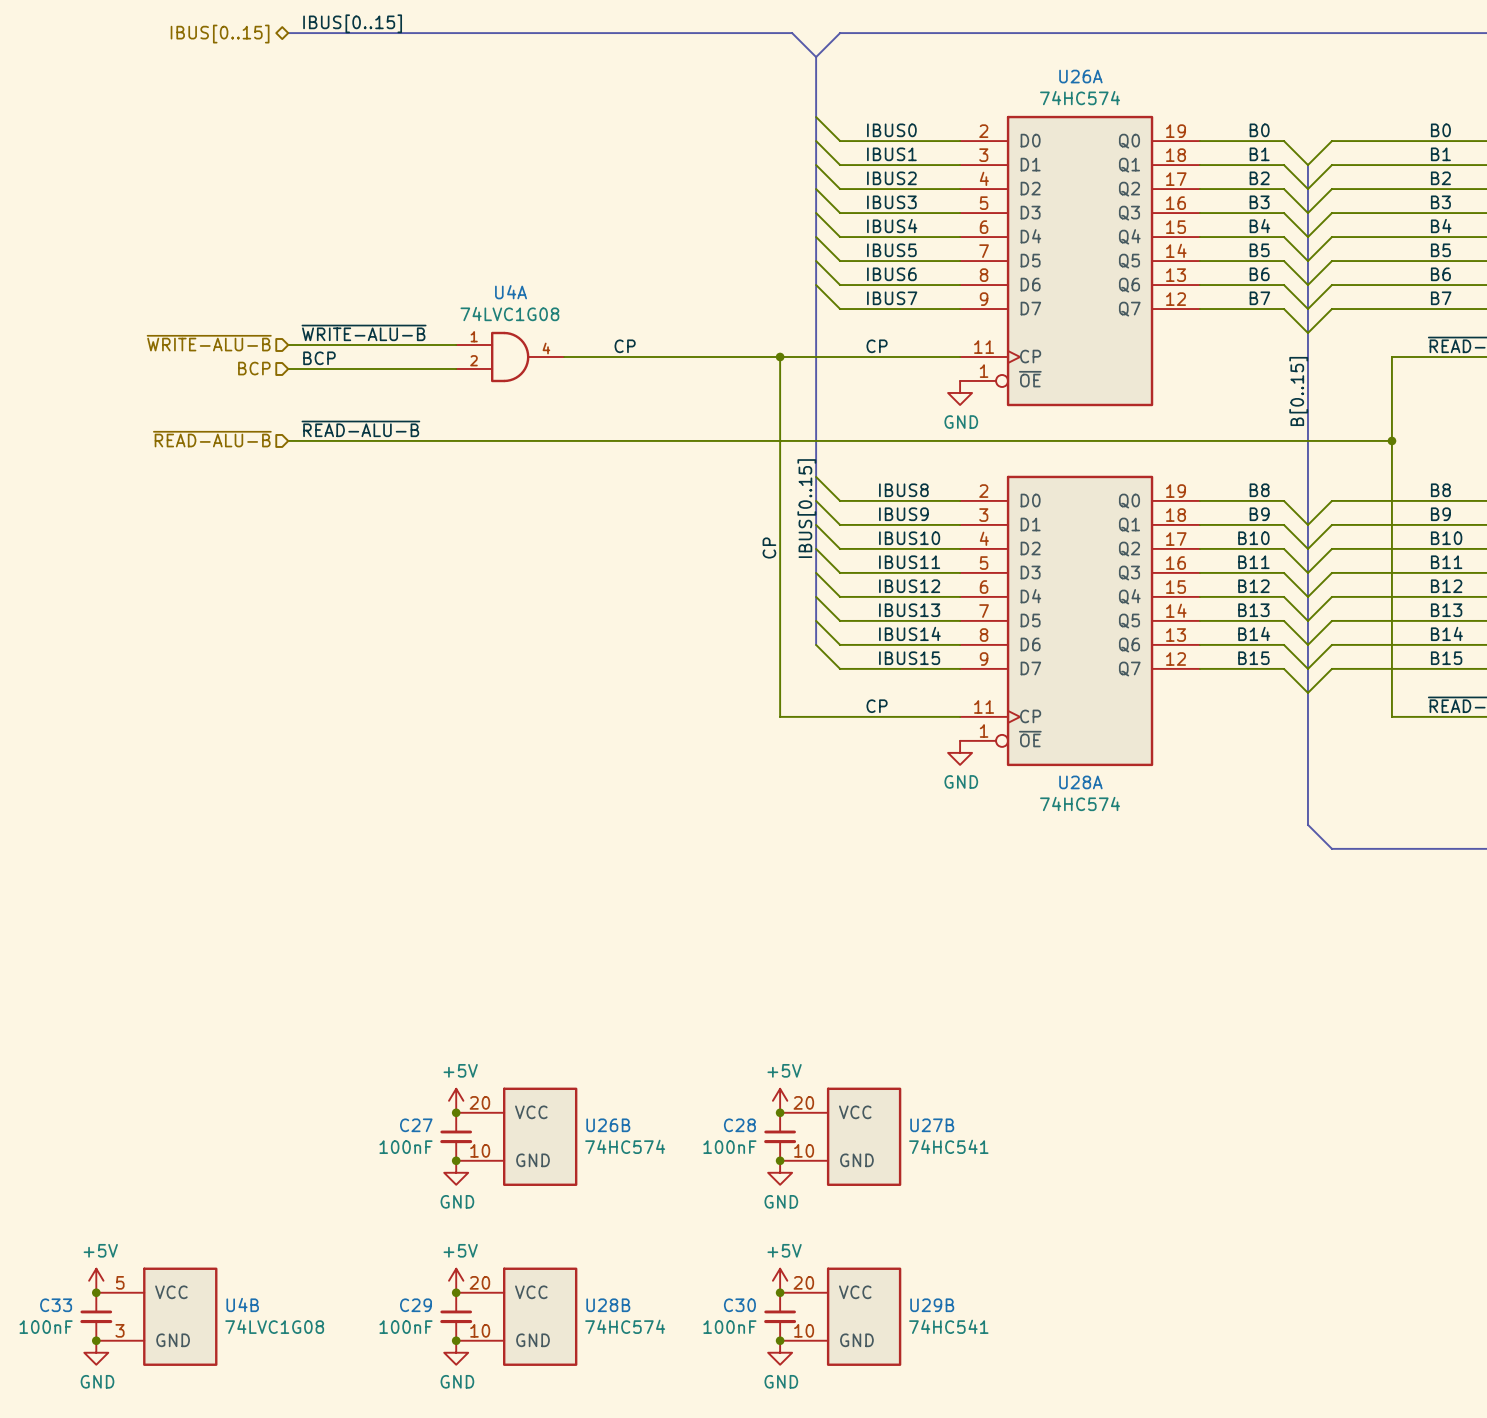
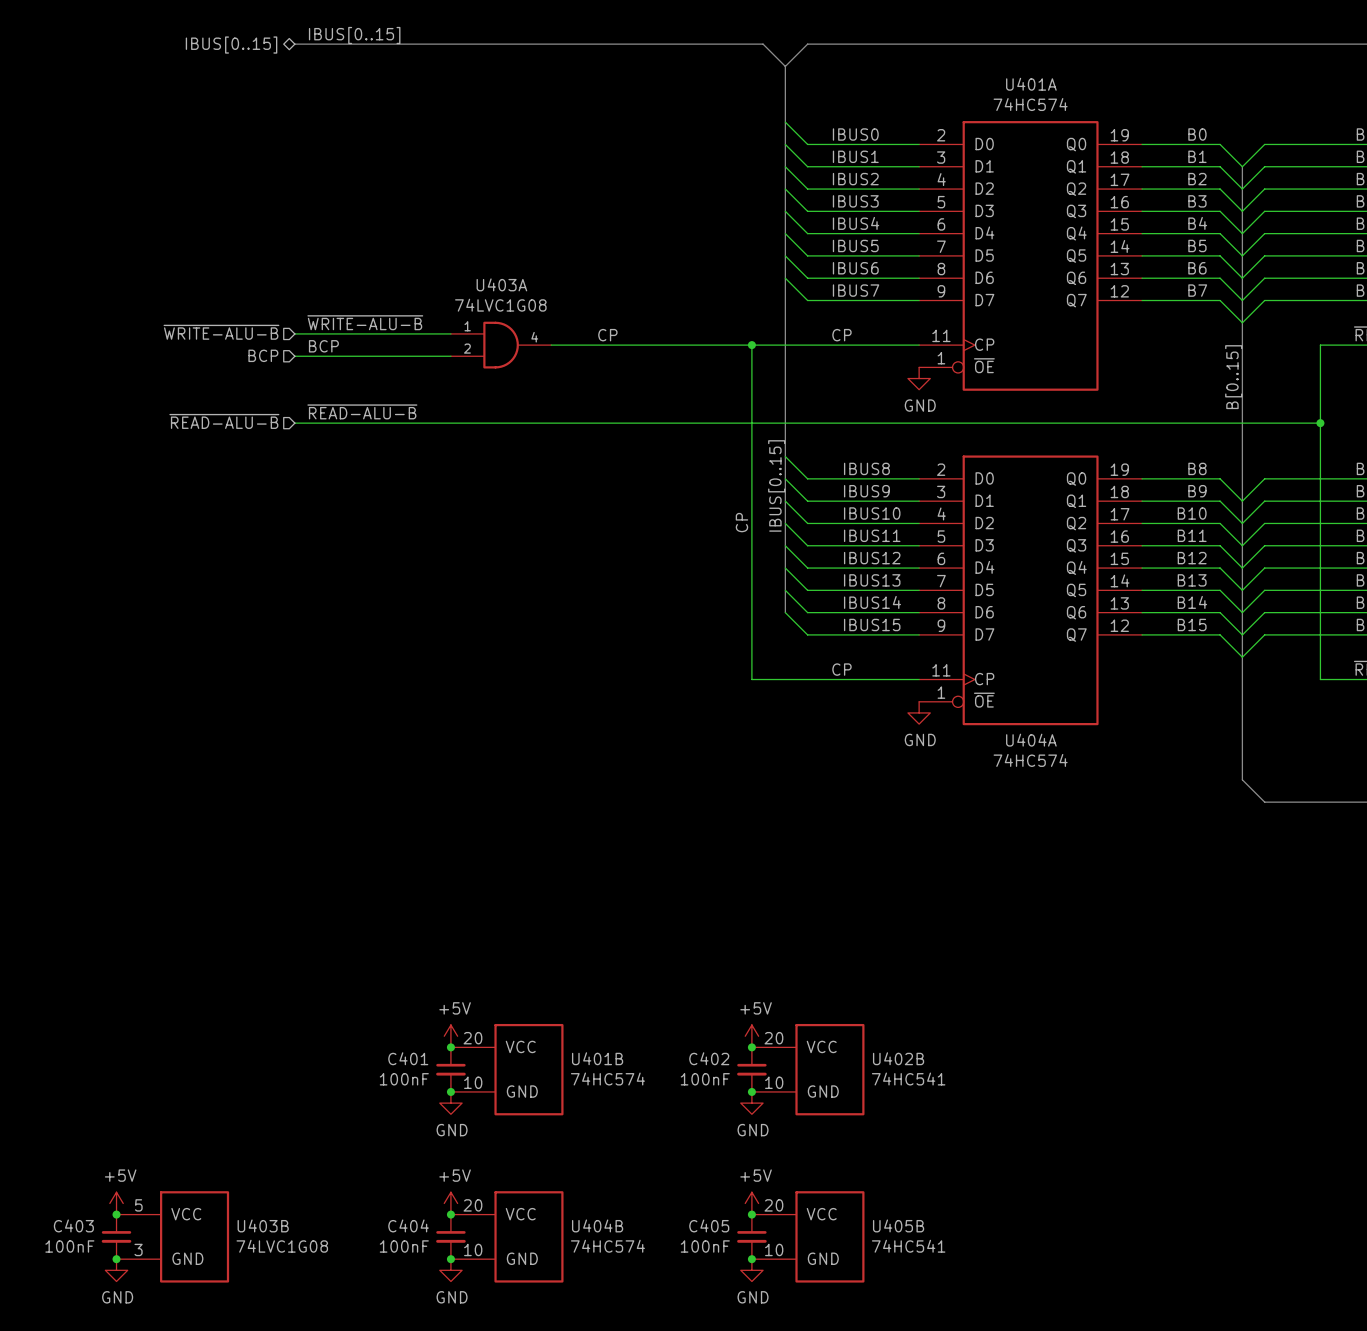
U26A name: U26A (1080, 76) -> U401A (1031, 84)
U4A name: U4A (511, 292) -> U403A (501, 284)
U28A name: U28A (1080, 782) -> U404A (1031, 740)
C27 name: C27 (416, 1125) -> C401 (408, 1058)
U26B name: U26B (608, 1125) -> U401B (597, 1058)
C28 name: C28 (739, 1125) -> C402 (709, 1058)
U27B name: U27B (932, 1125) -> U402B (898, 1058)
U4B name: U4B (242, 1304) -> U403B (263, 1225)
C33 name: C33 (56, 1305) -> C403 (73, 1225)
C29 name: C29 (416, 1305) -> C404 (408, 1225)
U28B name: U28B (608, 1305) -> U404B (597, 1225)
C30 name: C30 (739, 1305) -> C405 (709, 1225)
U29B name: U29B (932, 1305) -> U405B (898, 1225)

